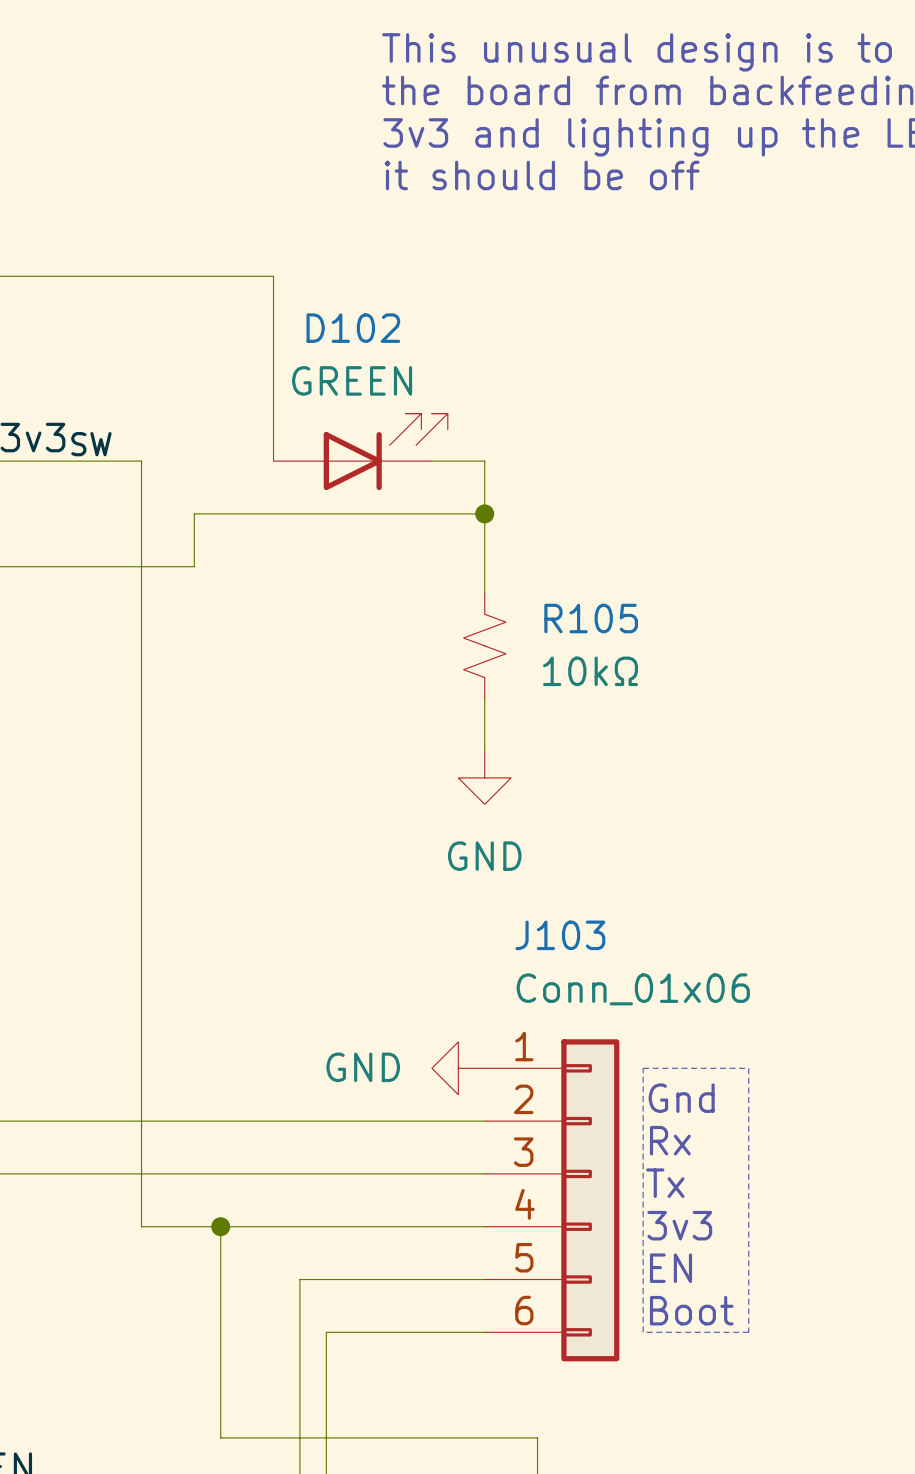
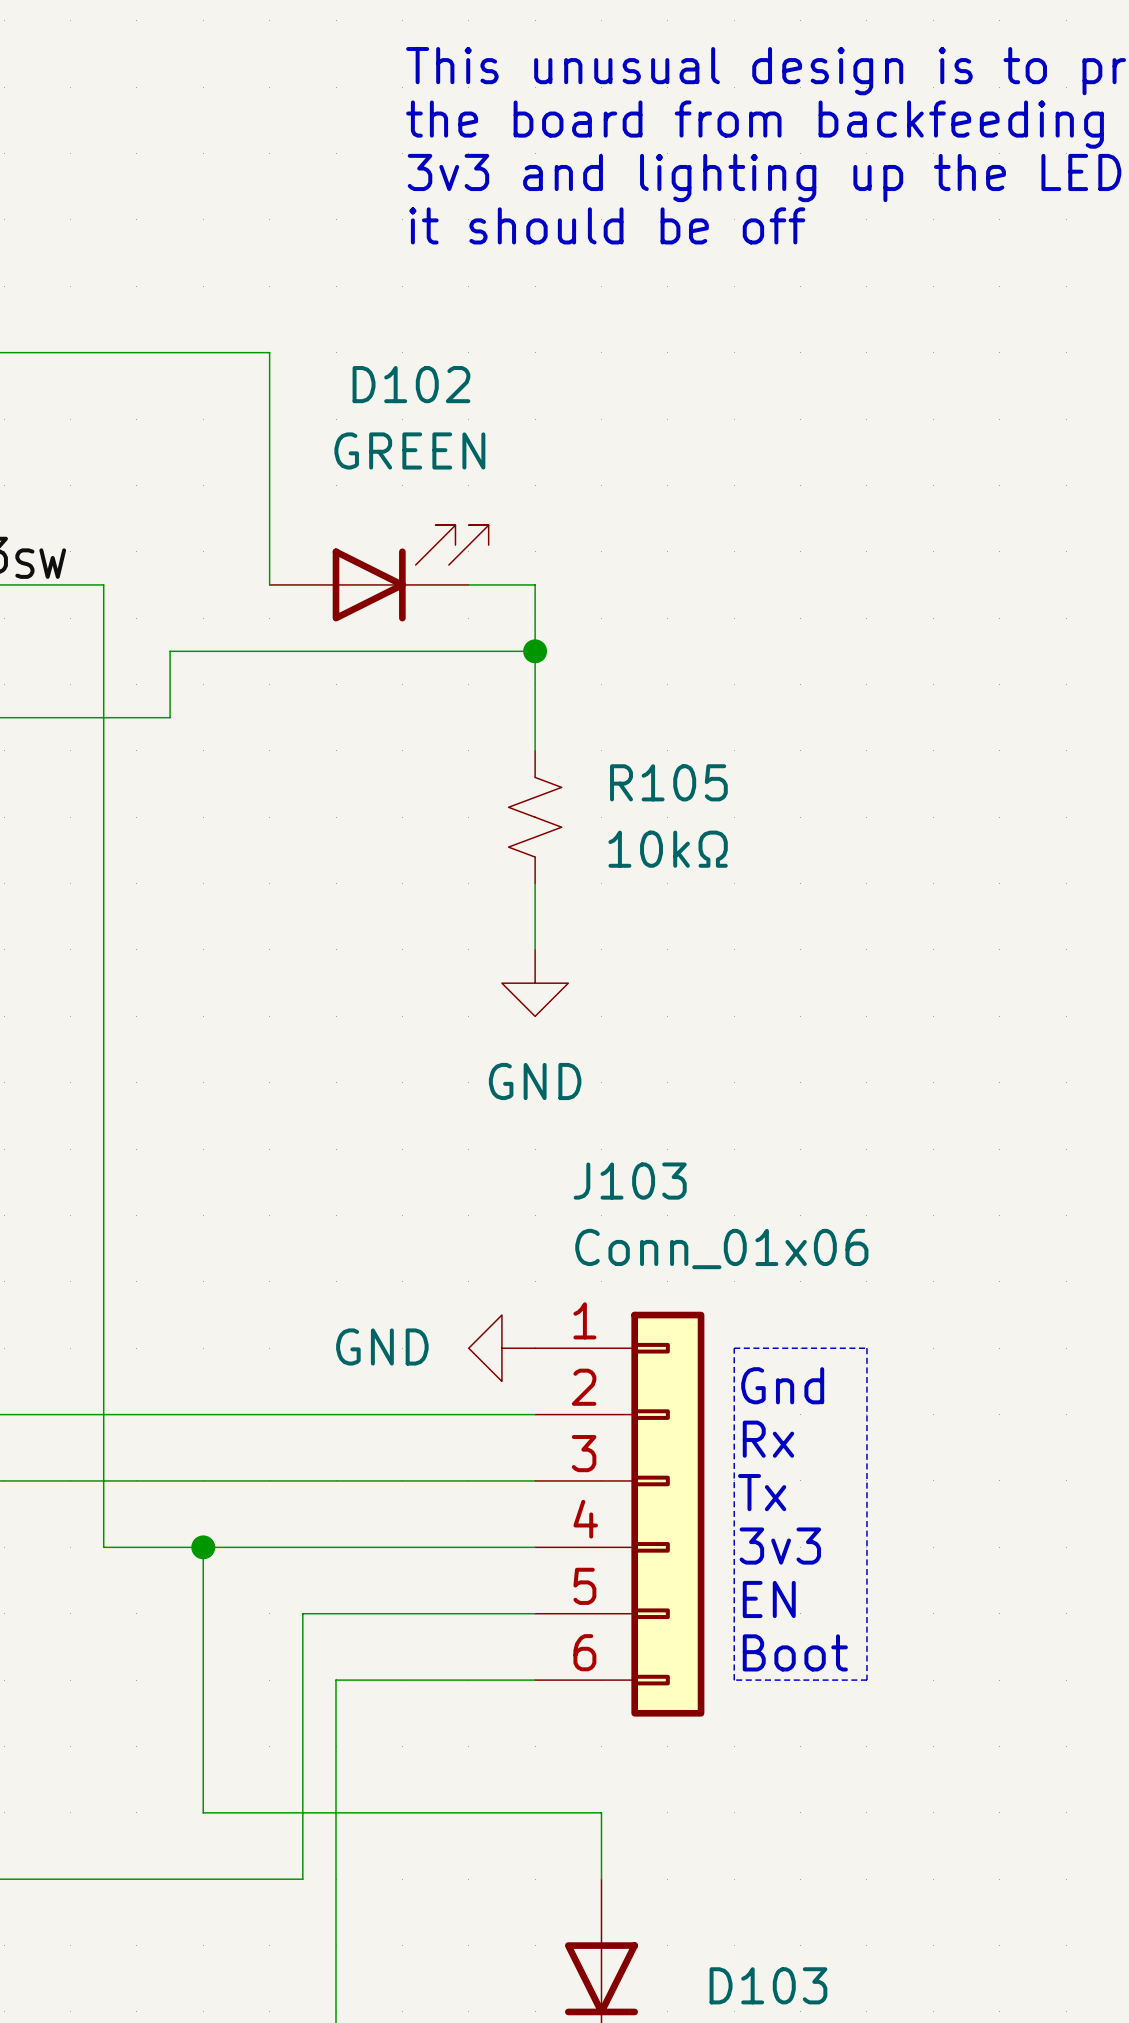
D102 name position: D102 (353, 328) -> D102 (411, 384)
D102 value position: GREEN (352, 380) -> GREEN (409, 450)

